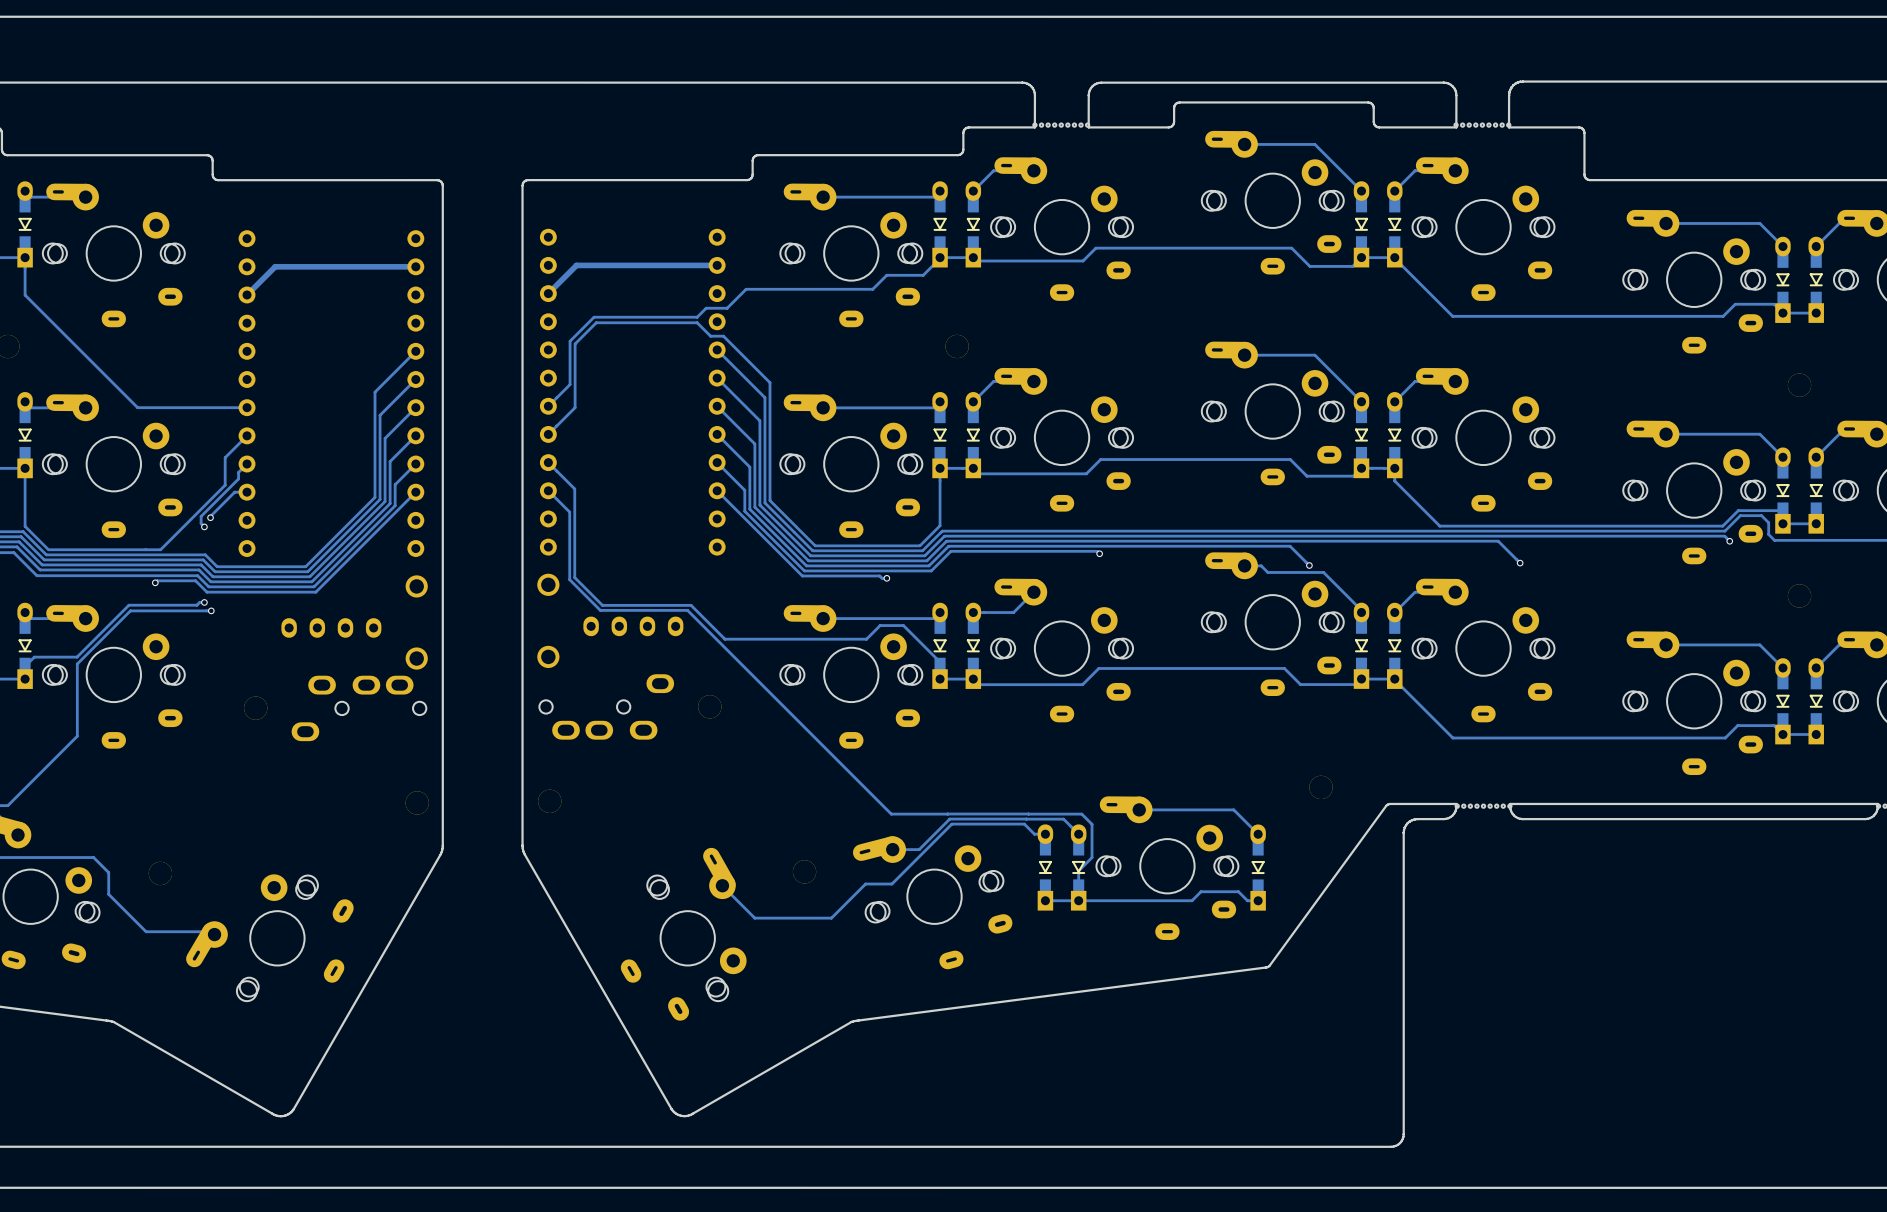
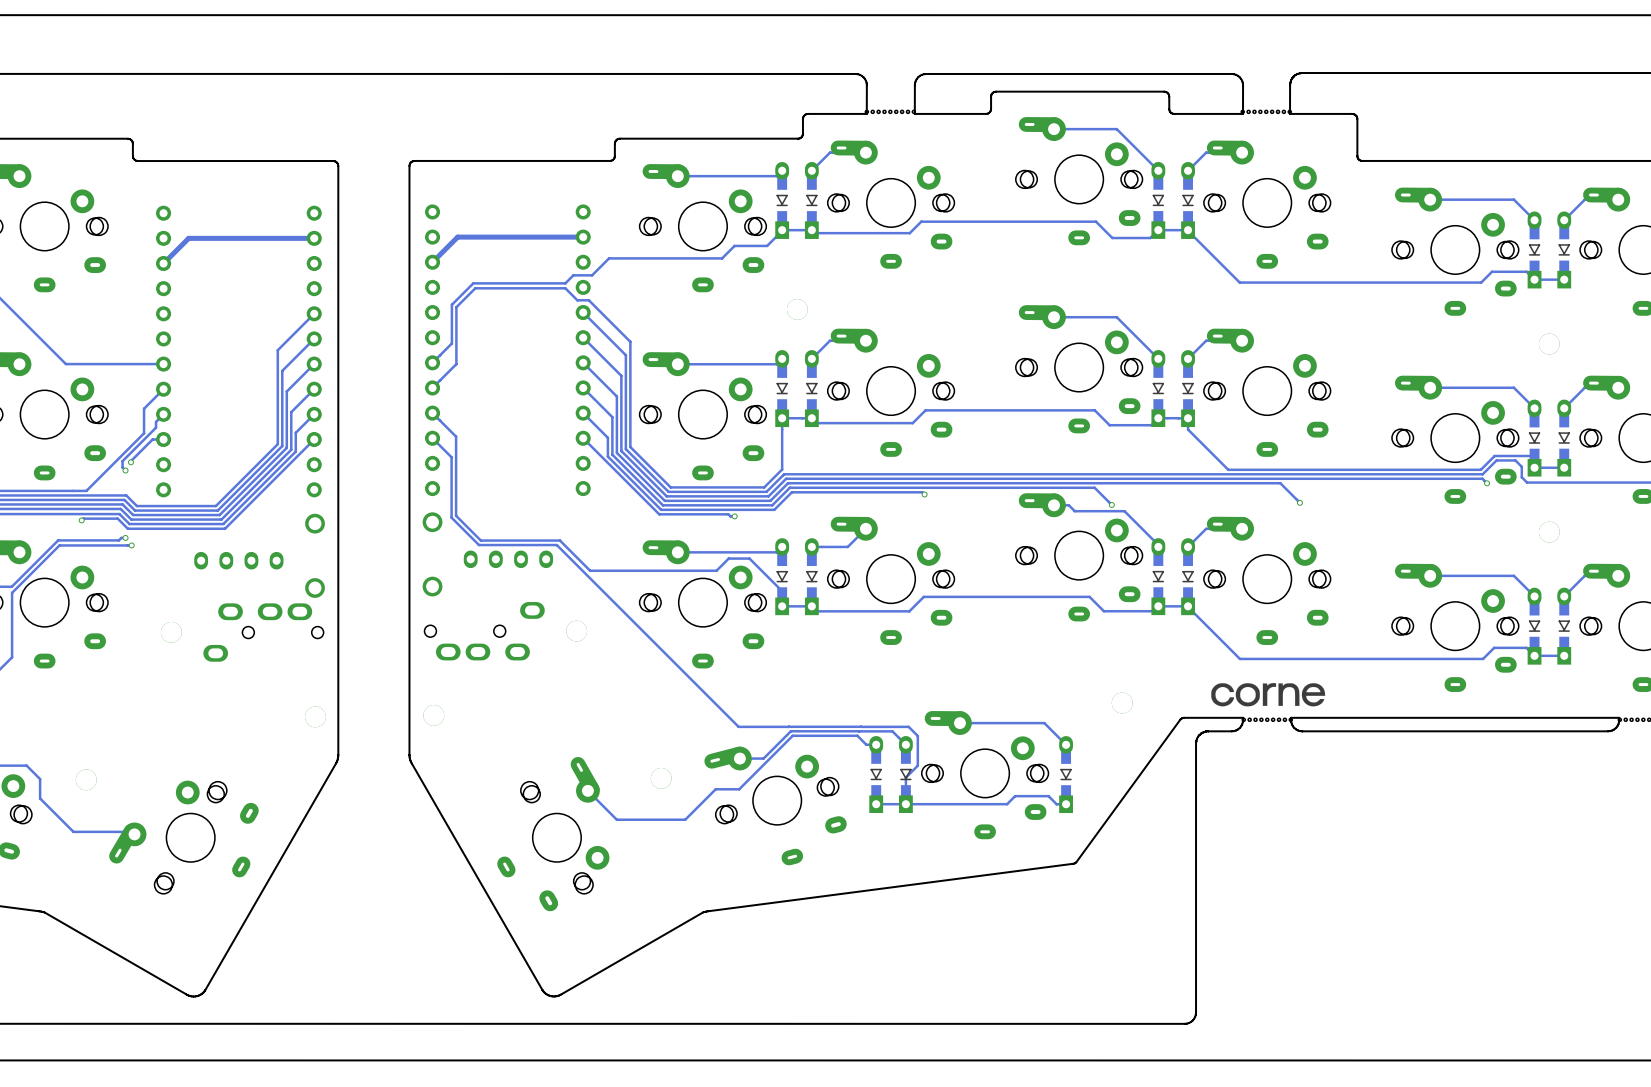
drawing: none -> [1211, 683, 1326, 707]

